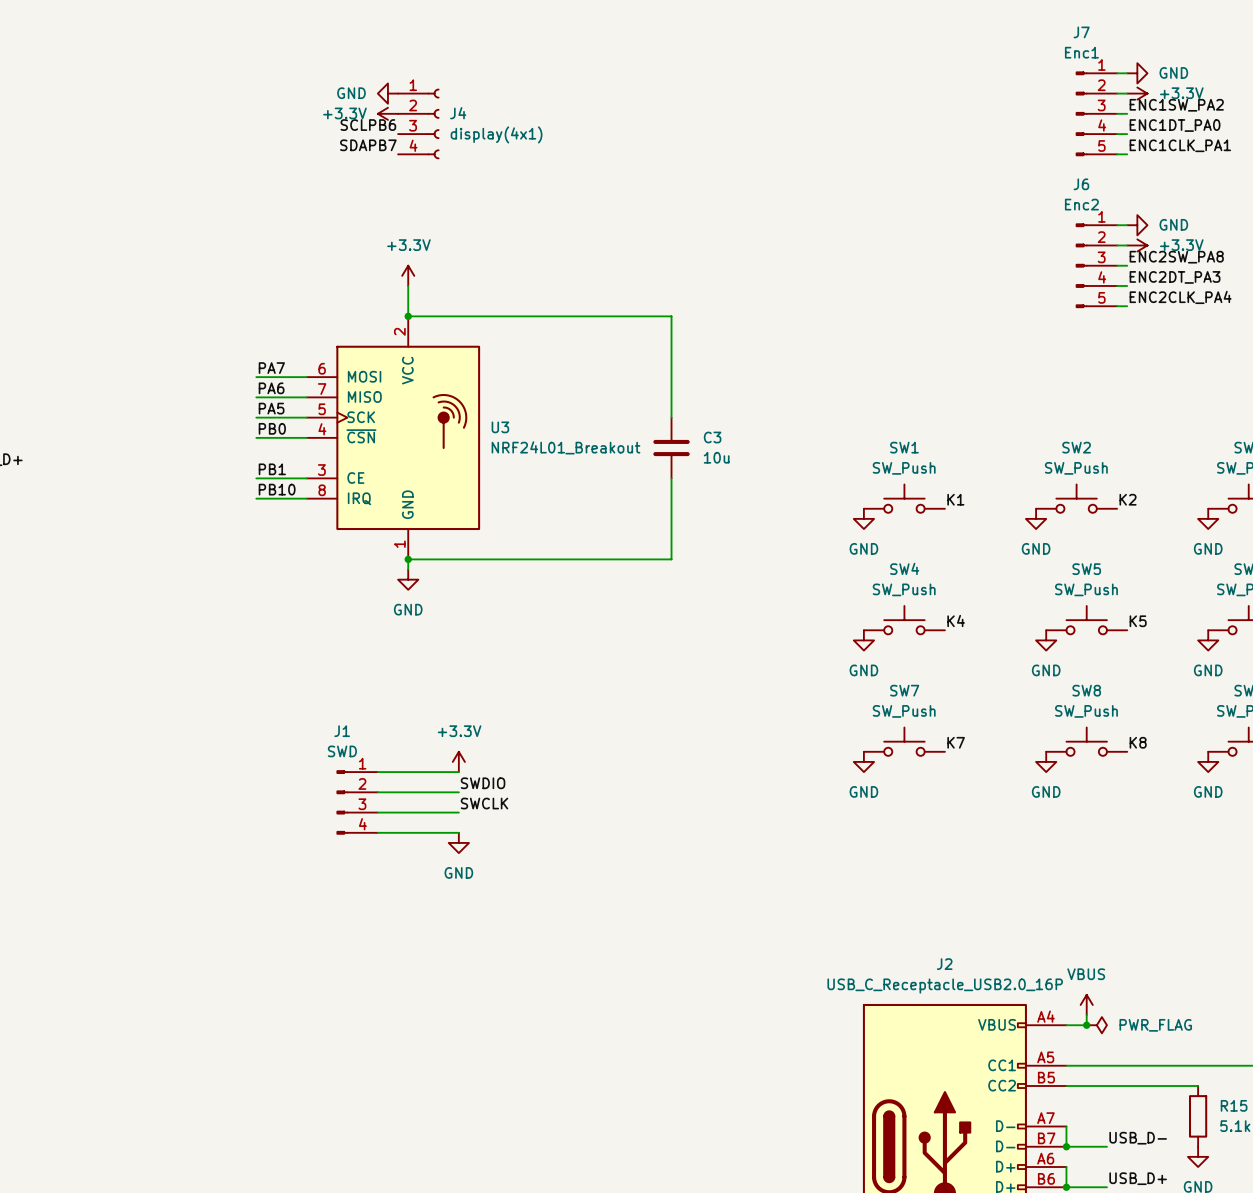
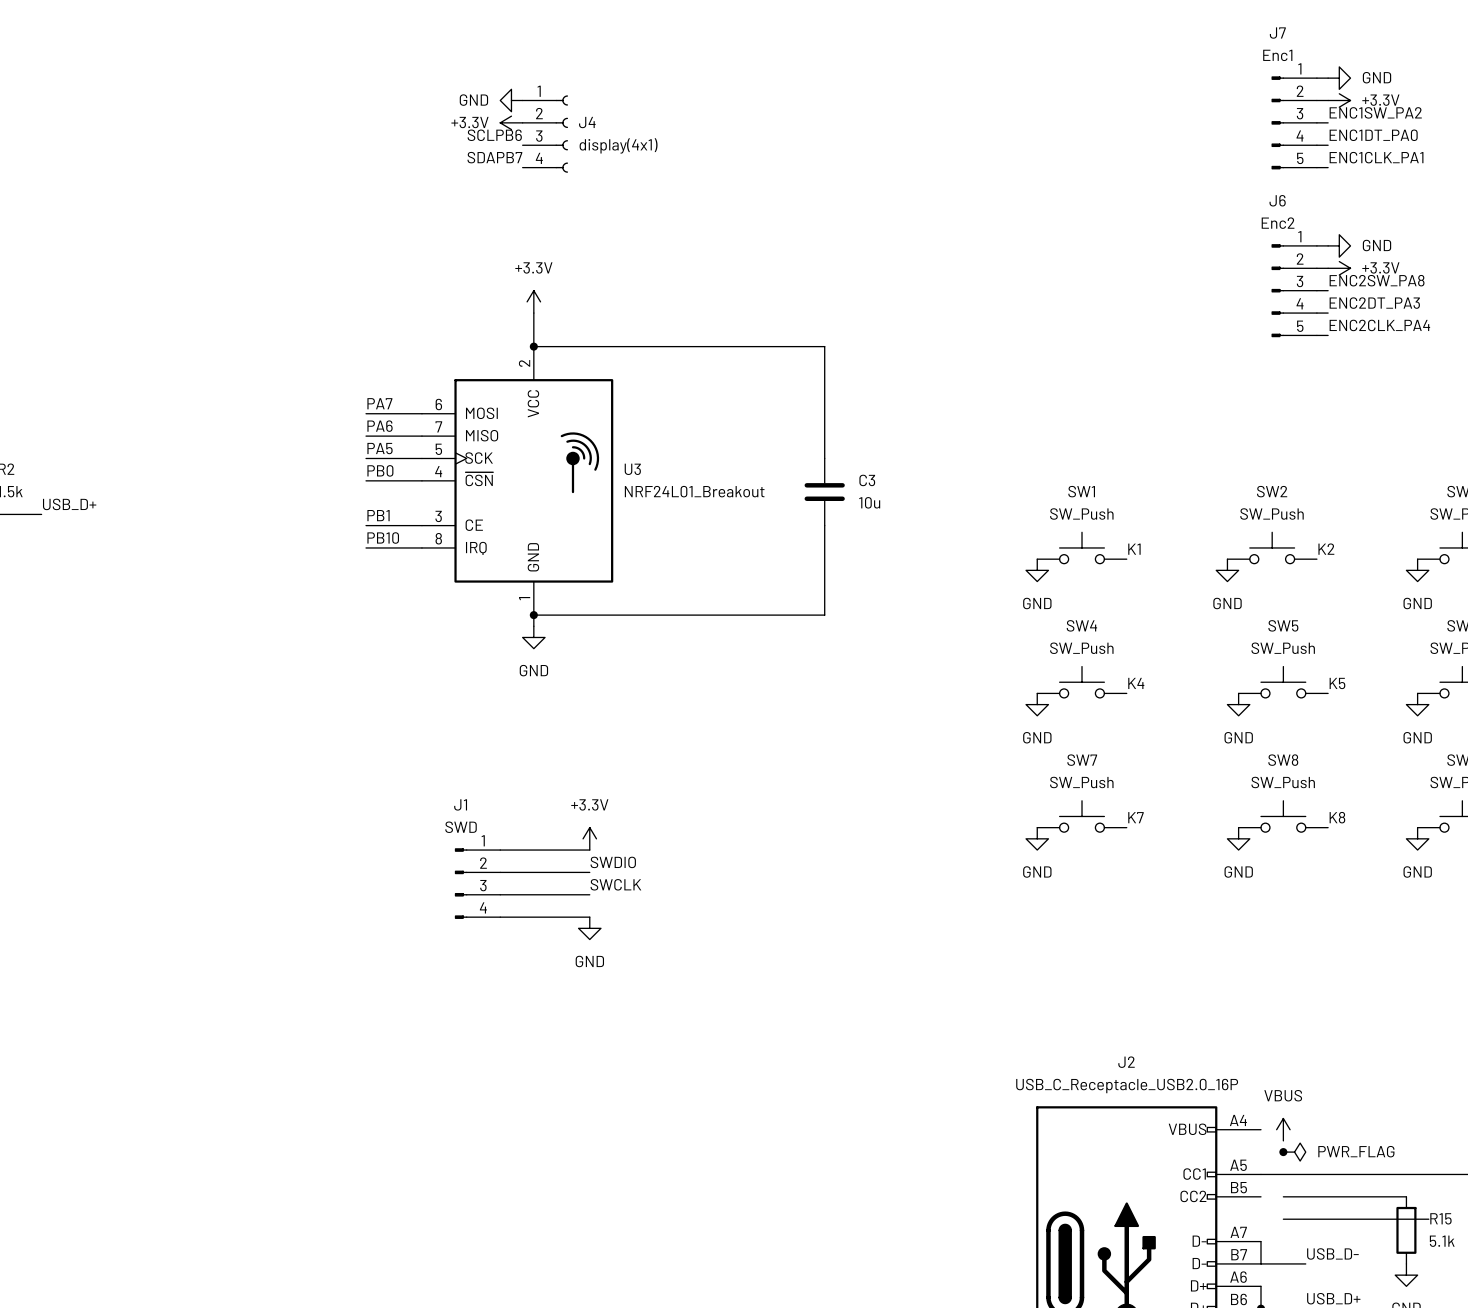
power symbol position: VBUS (1086, 1004) -> VBUS (1283, 1129)
wire: (1086, 1015) (1086, 1025) (1066, 1025) -> none
junction position: (1086, 1025) -> (1283, 1152)
power symbol position: PWR_FLAG (1096, 1025) -> PWR_FLAG (1294, 1152)
wire: (1066, 1085) (1086, 1085) -> none
wire: none -> (1283, 1219) (1428, 1219)
junction: (1066, 1146) -> none

